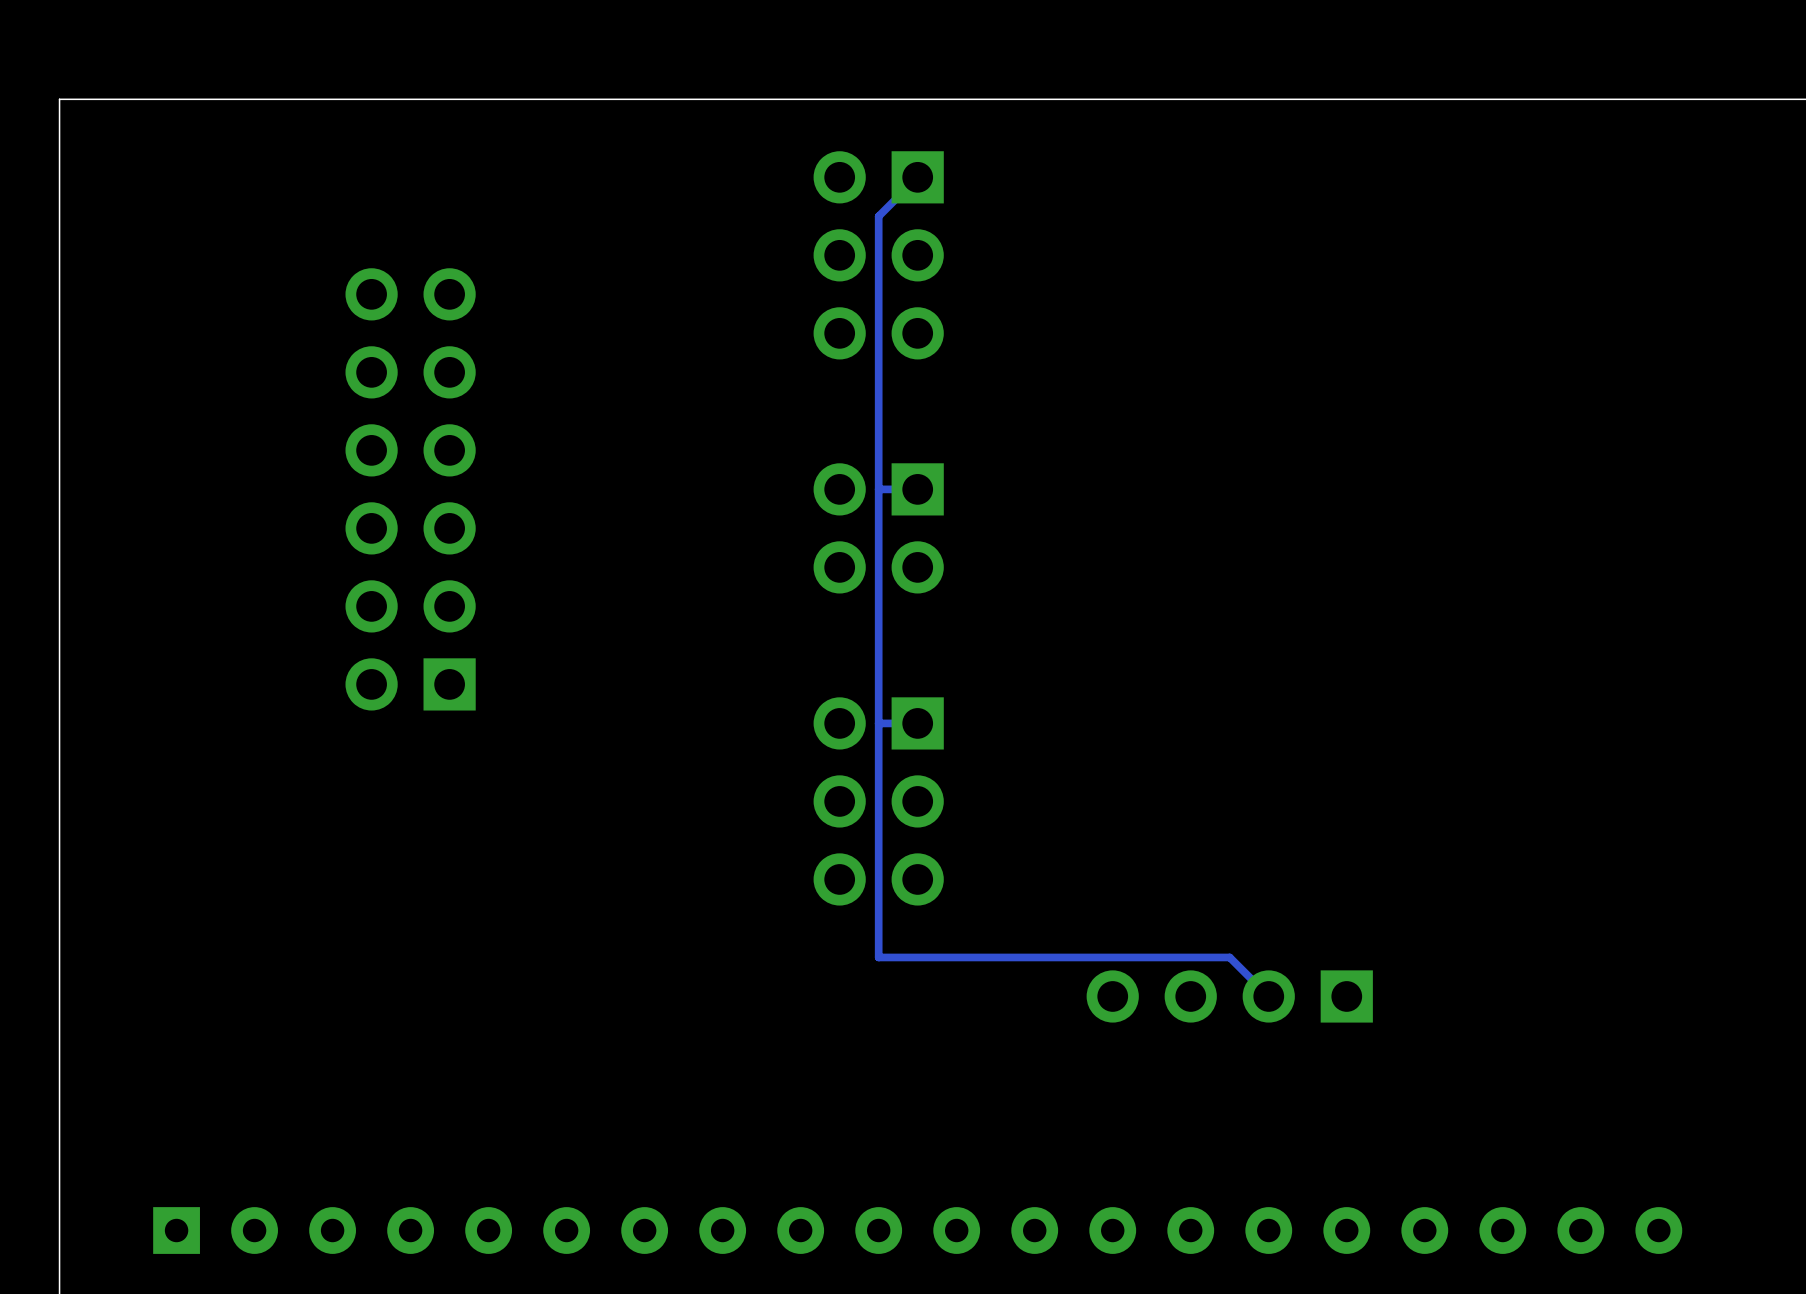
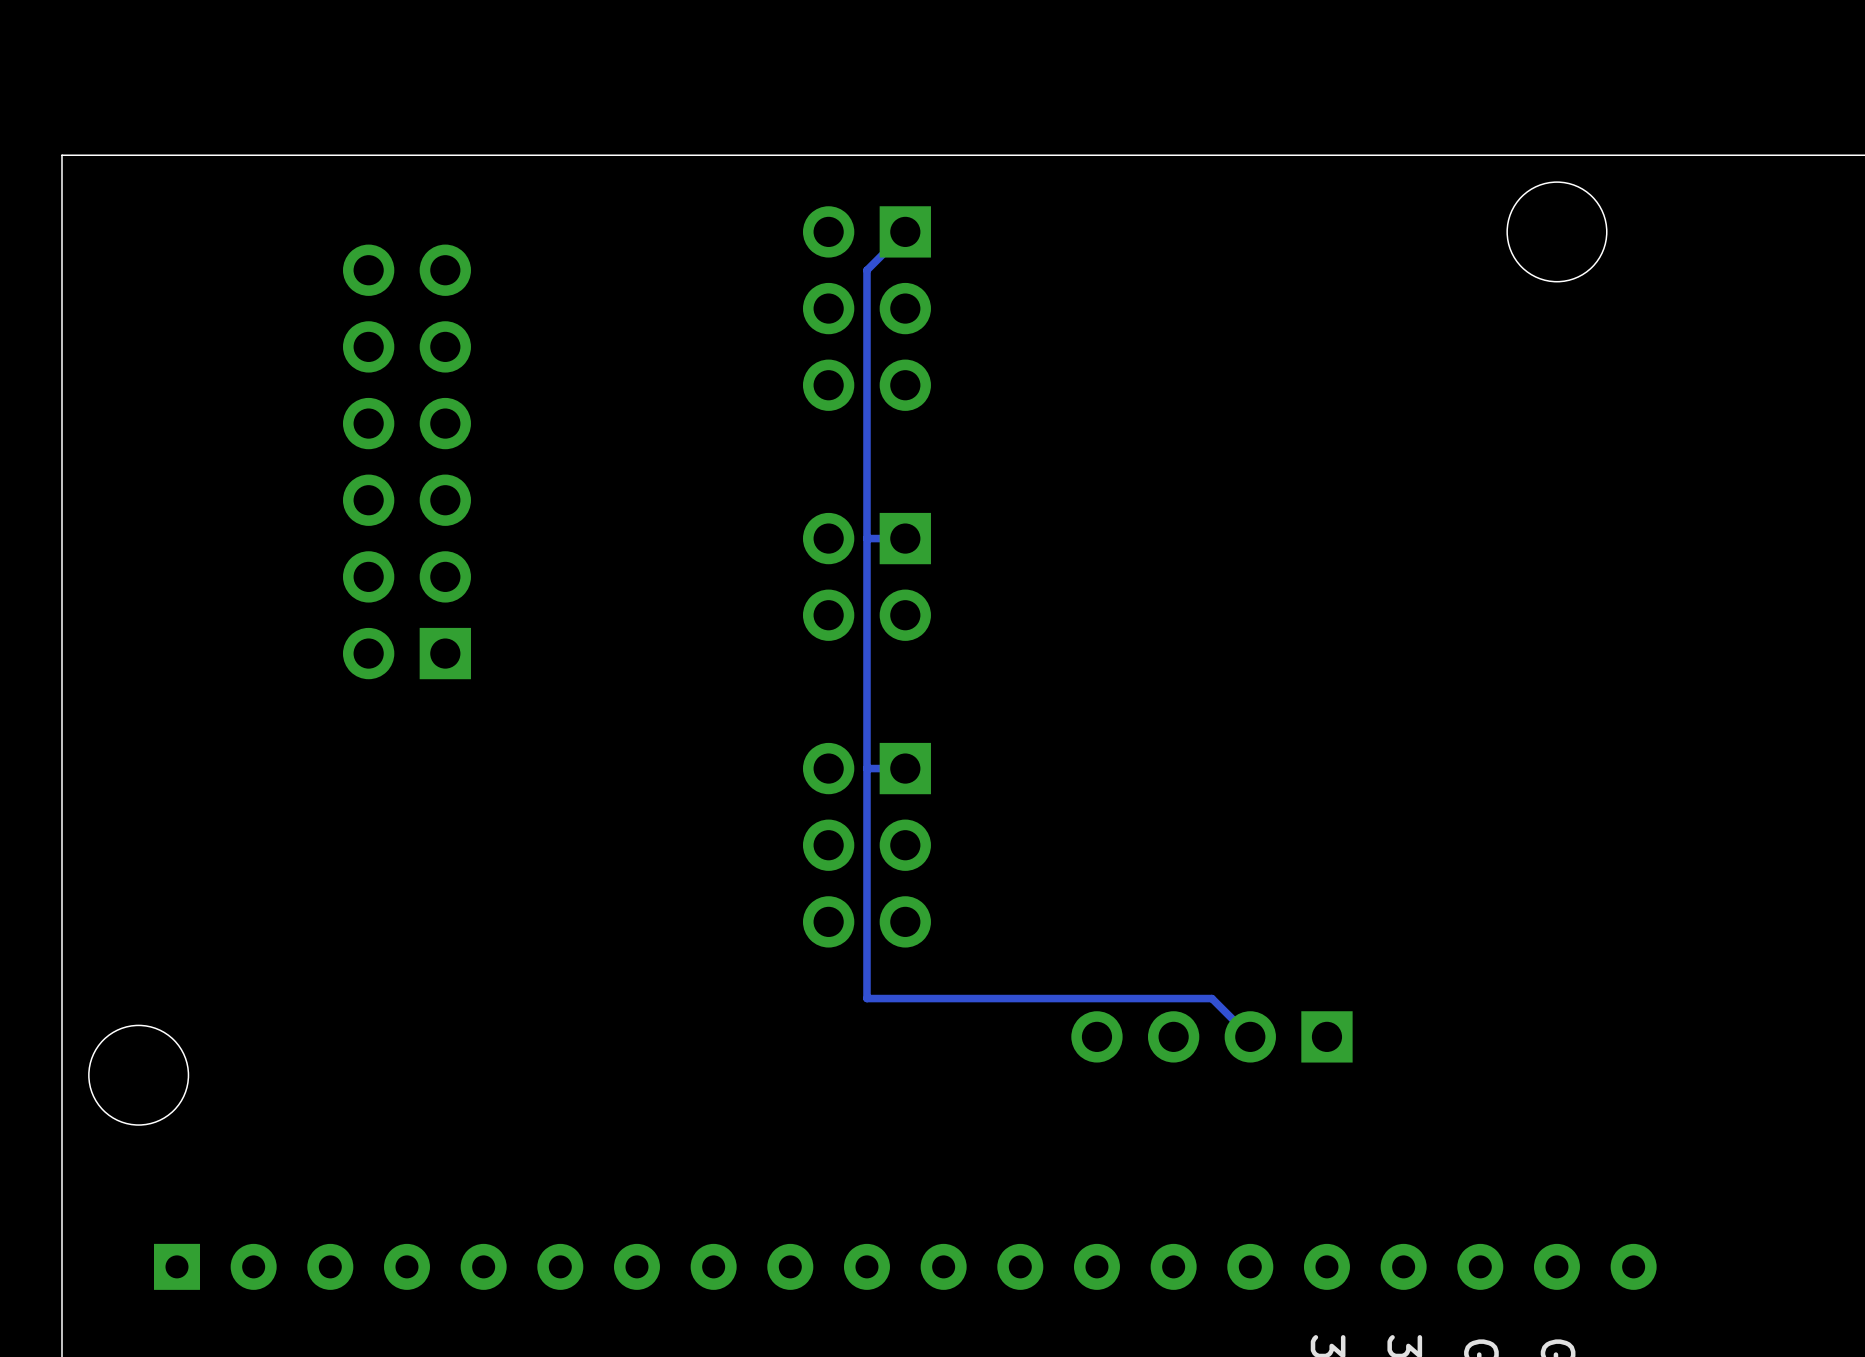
round board edge: none -> [1506, 181, 1608, 283]
part position: (410, 489) -> (406, 461)
round board edge: none -> [88, 1024, 190, 1126]

